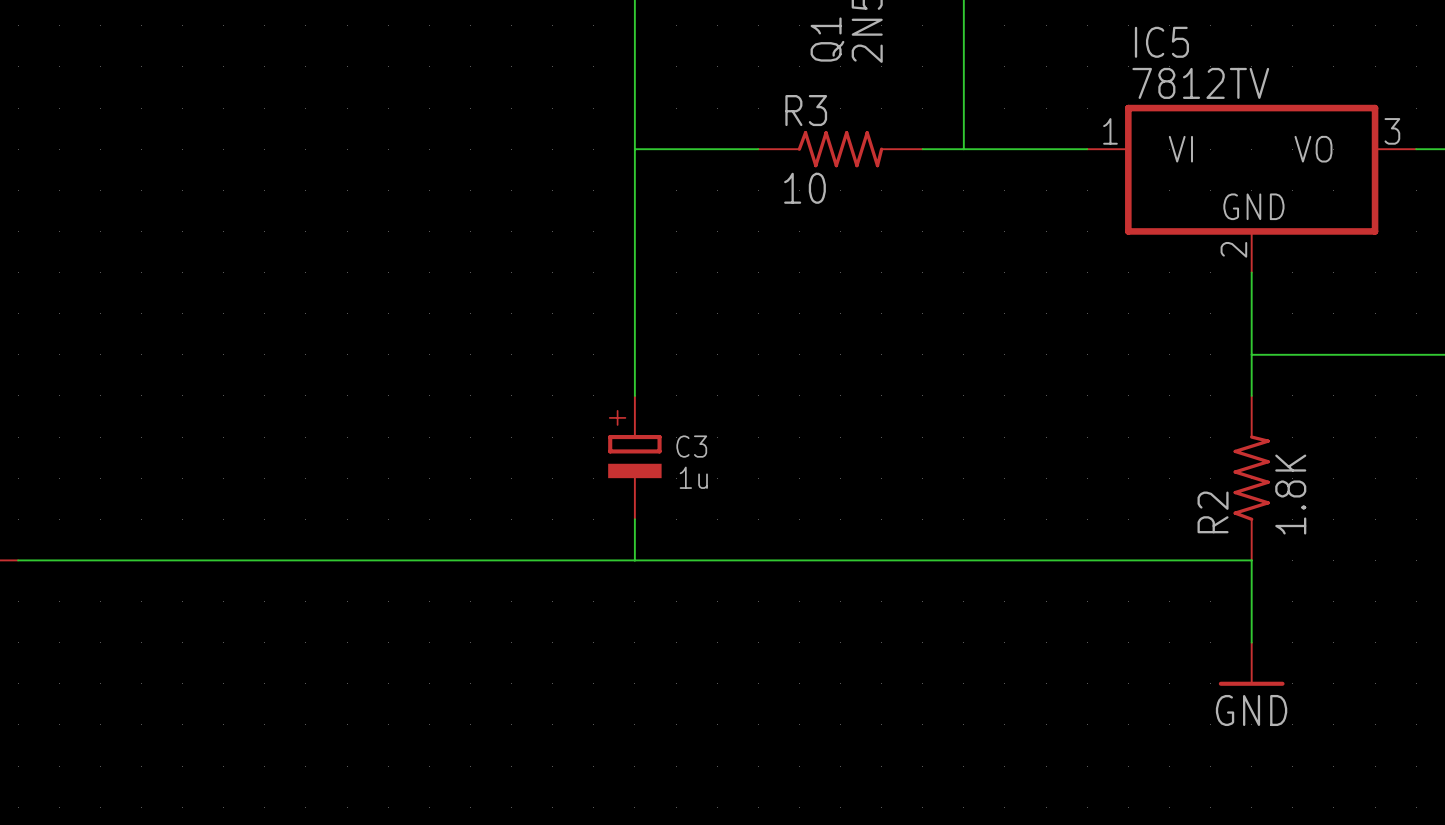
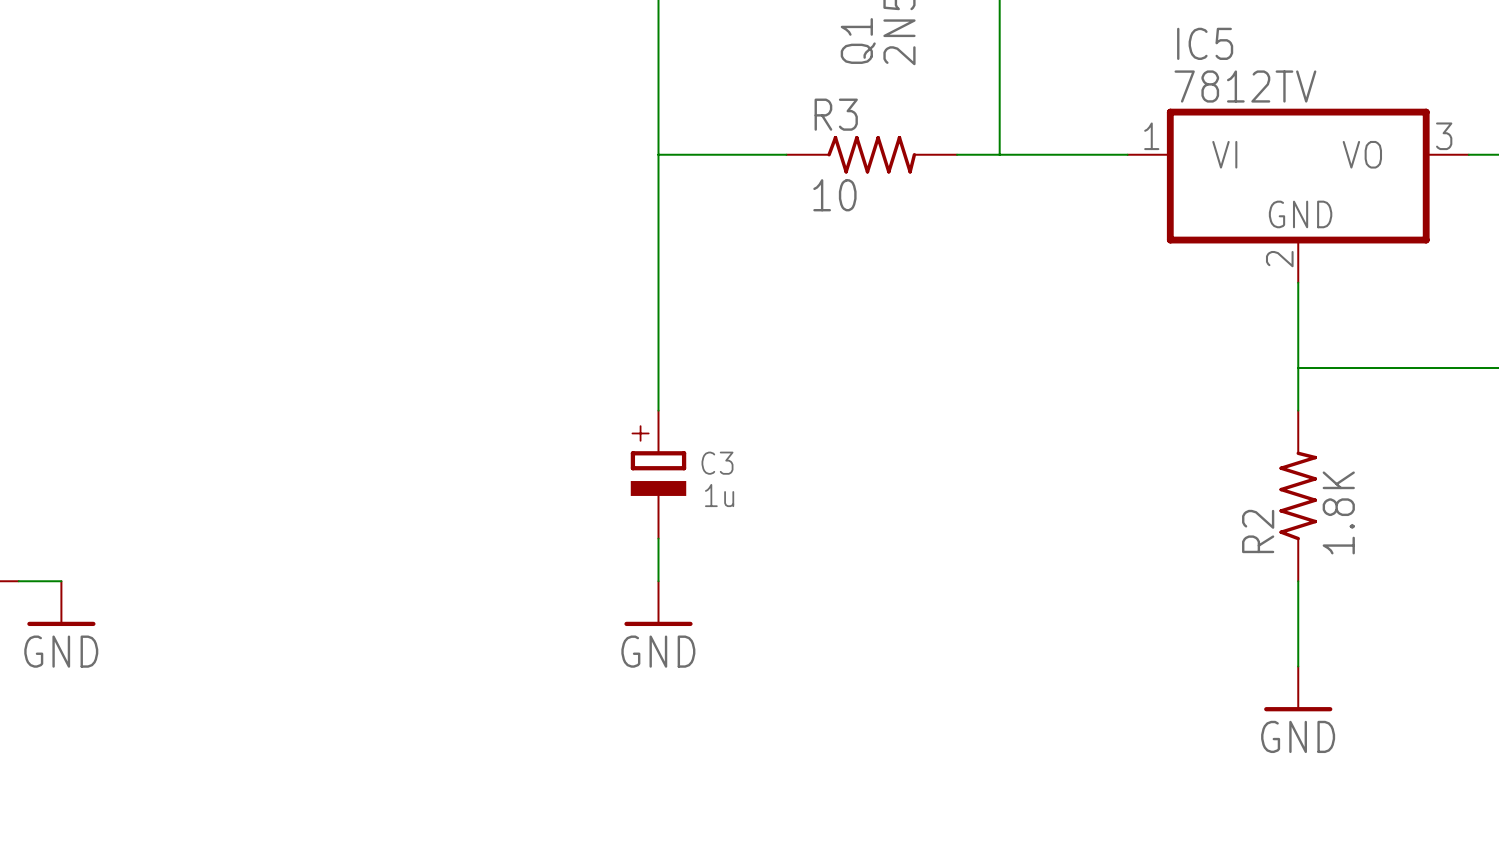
wire: (59, 560) (1251, 560) -> none
power symbol: none -> GND (61, 603)
power symbol: none -> GND (658, 603)

